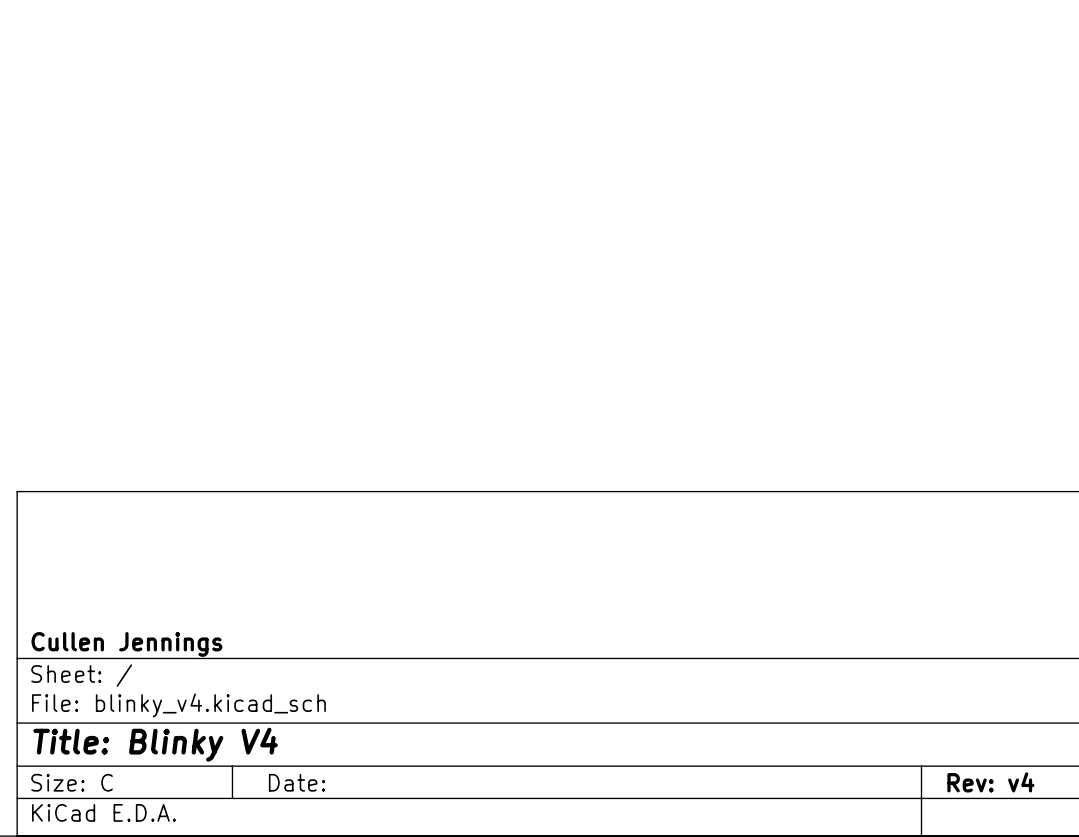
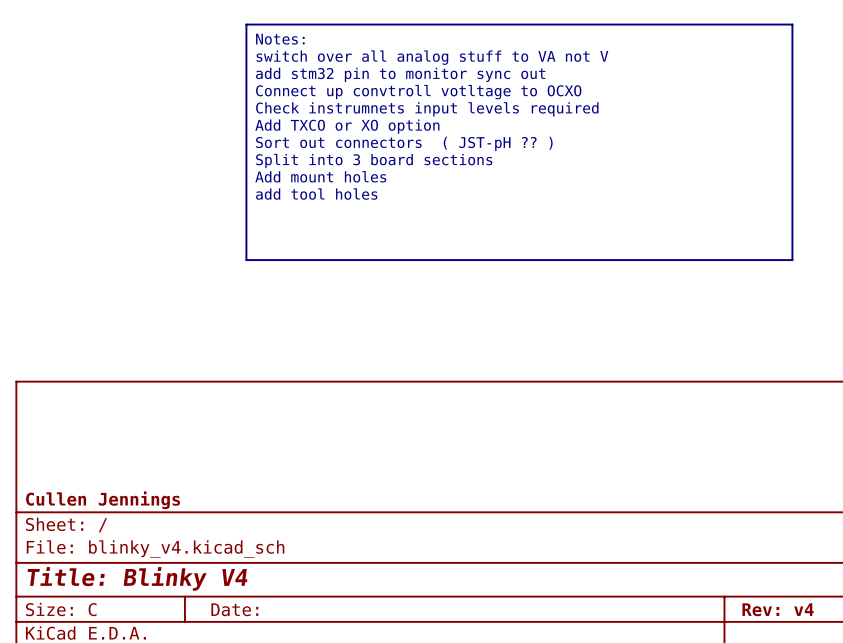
line: none -> (246, 24) (792, 24) (792, 260) (246, 260) (246, 24)
text: none -> Notes: (280, 39)
text: none -> switch over all analog stuff to VA not V (432, 57)
text: none -> add stm32 pin to monitor sync out (400, 74)
text: none -> Connect up convtroll votltage to OCXO (418, 92)
text: none -> Check instrumnets input levels required (427, 109)
text: none -> Add TXCO or XO option (347, 126)
text: none -> Sort out connectors ( JST-pH ?? ) (404, 143)
text: none -> Split into 3 board sections (374, 161)
text: none -> Add mount holes (320, 176)
text: none -> add tool holes (316, 194)

